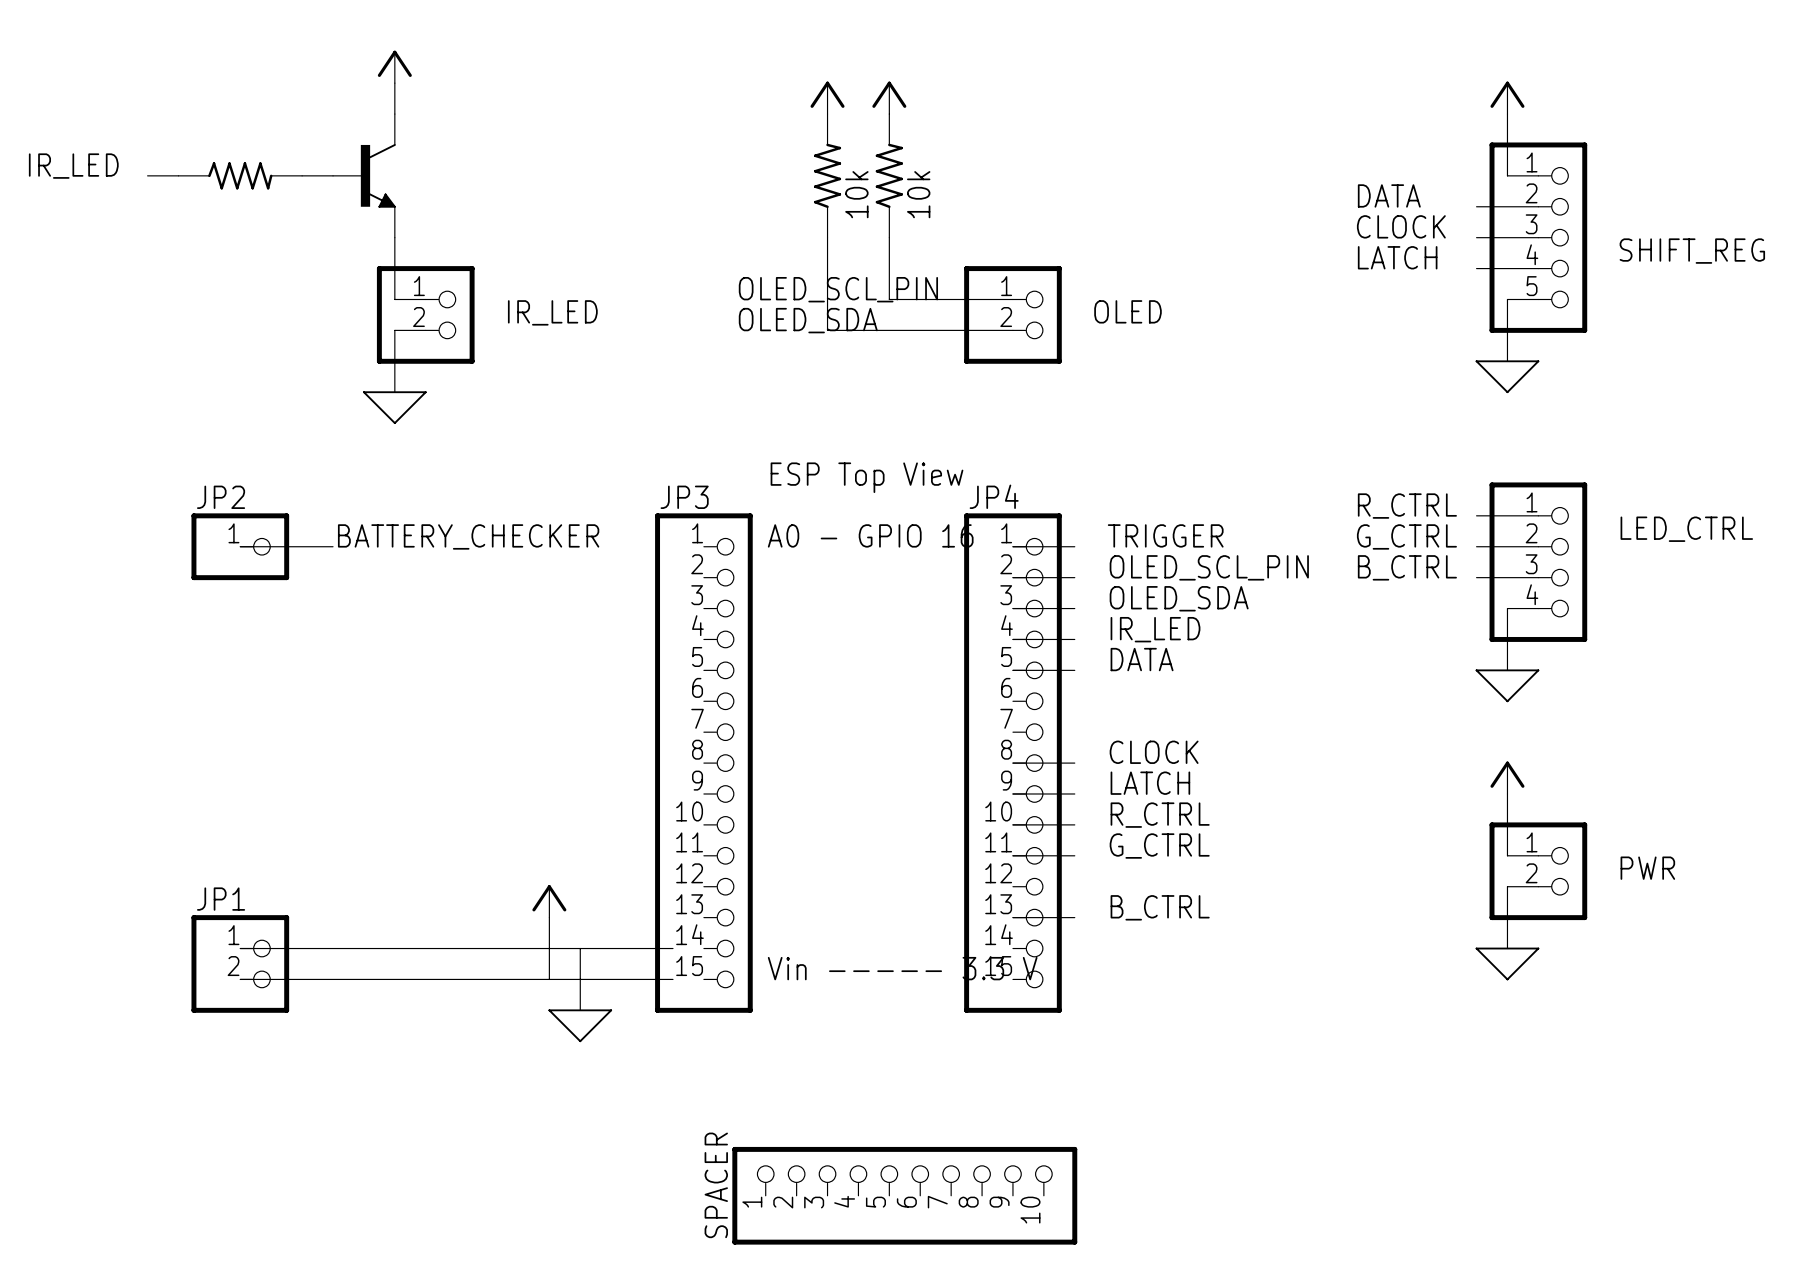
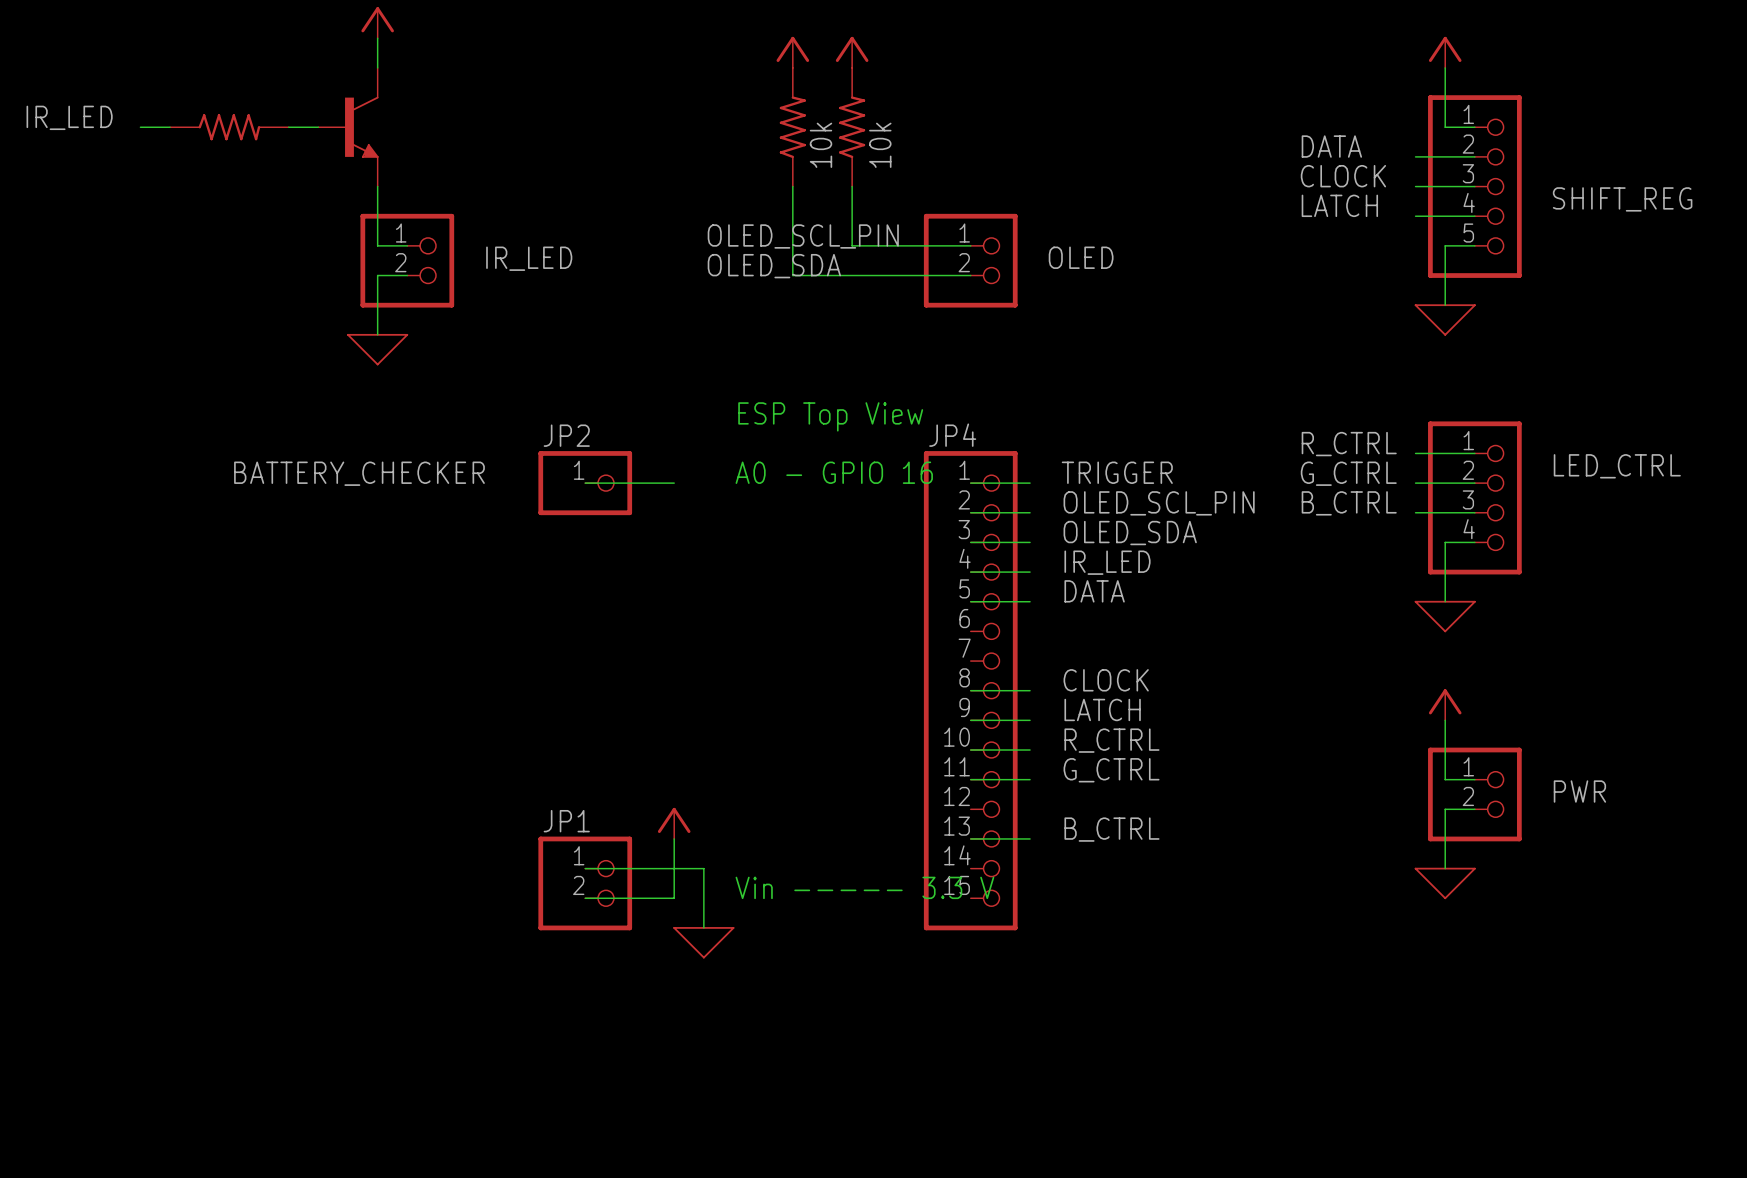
label position: BATTERY_CHECKER (468, 536) -> BATTERY_CHECKER (359, 473)
wire: (240, 546) (333, 546) -> none
JP2 position: (240, 546) -> (585, 483)
wire: none -> (585, 483) (674, 483)
JP3: (703, 763) -> none
power symbol position: (549, 901) -> (674, 823)
wire: (549, 917) (549, 979) -> none
wire: none -> (674, 838) (674, 898) (644, 898)
wire: (240, 948) (611, 948) -> none
wire: (580, 948) (580, 1010) -> none
wire: none -> (644, 868) (703, 868) (703, 927)
JP1 position: (240, 963) -> (585, 883)
wire: (240, 979) (611, 979) -> none
power symbol position: (580, 1025) -> (703, 942)
SPACER: (904, 1195) -> none

